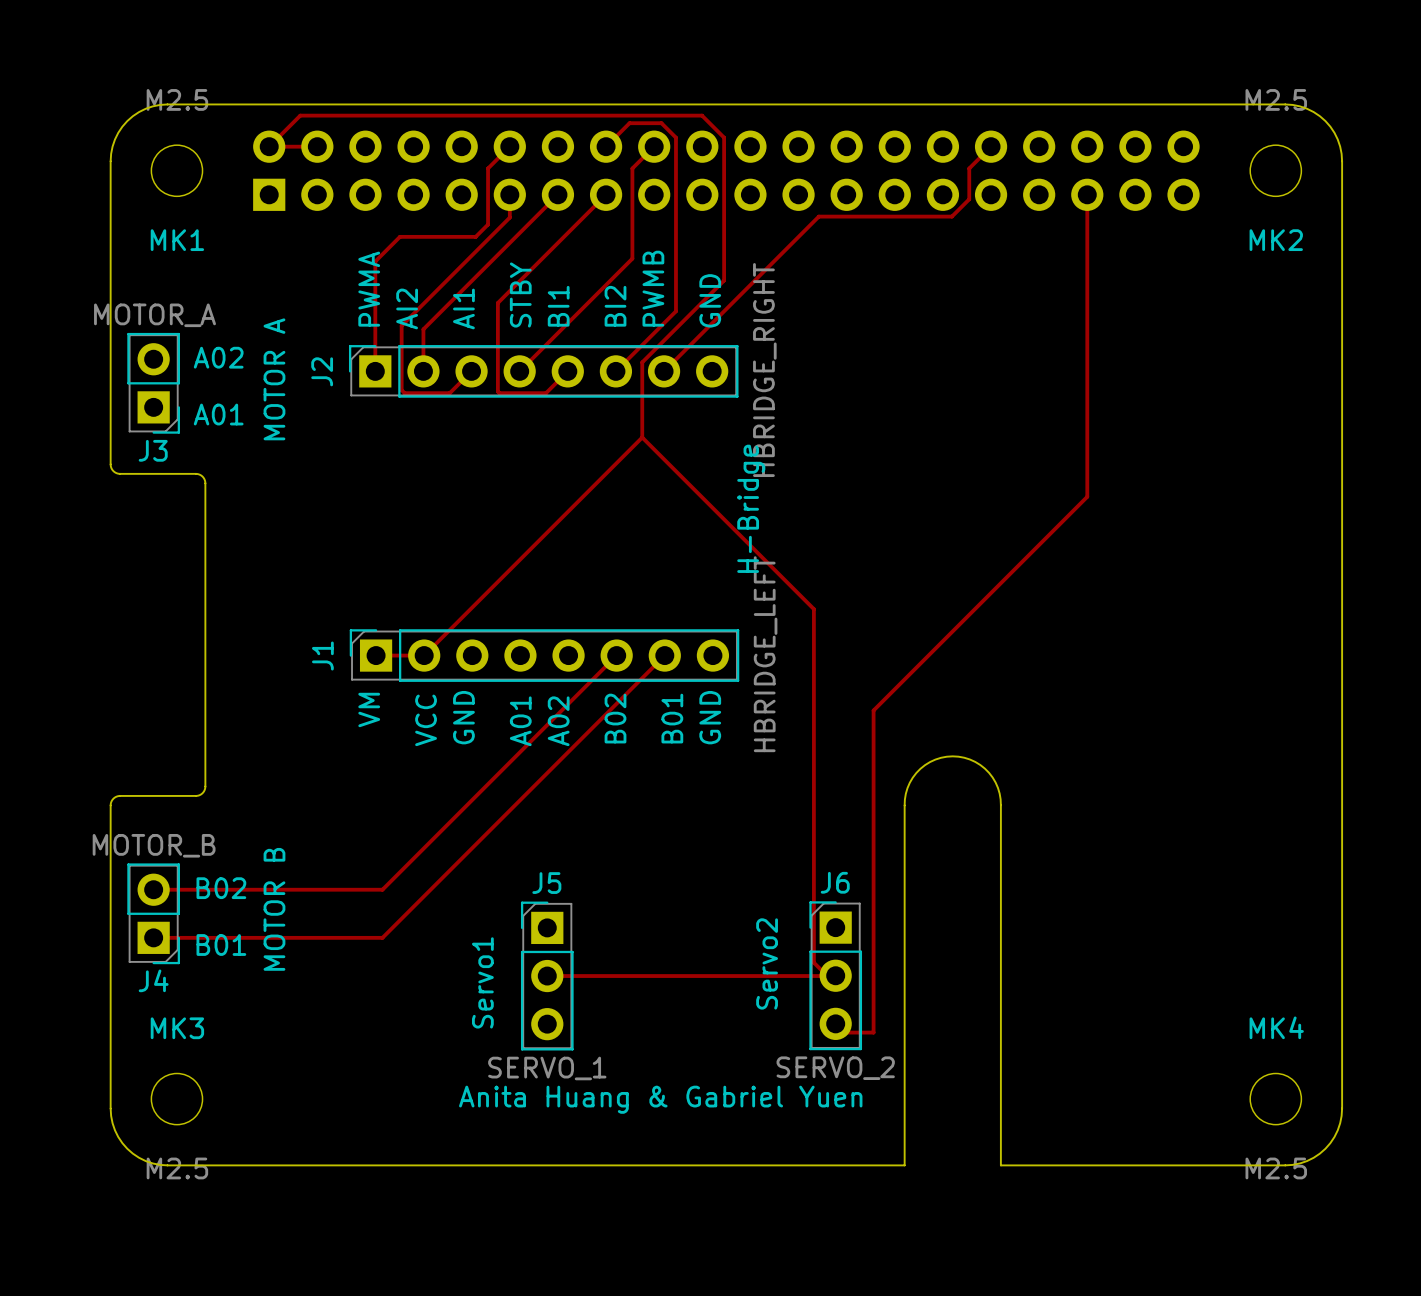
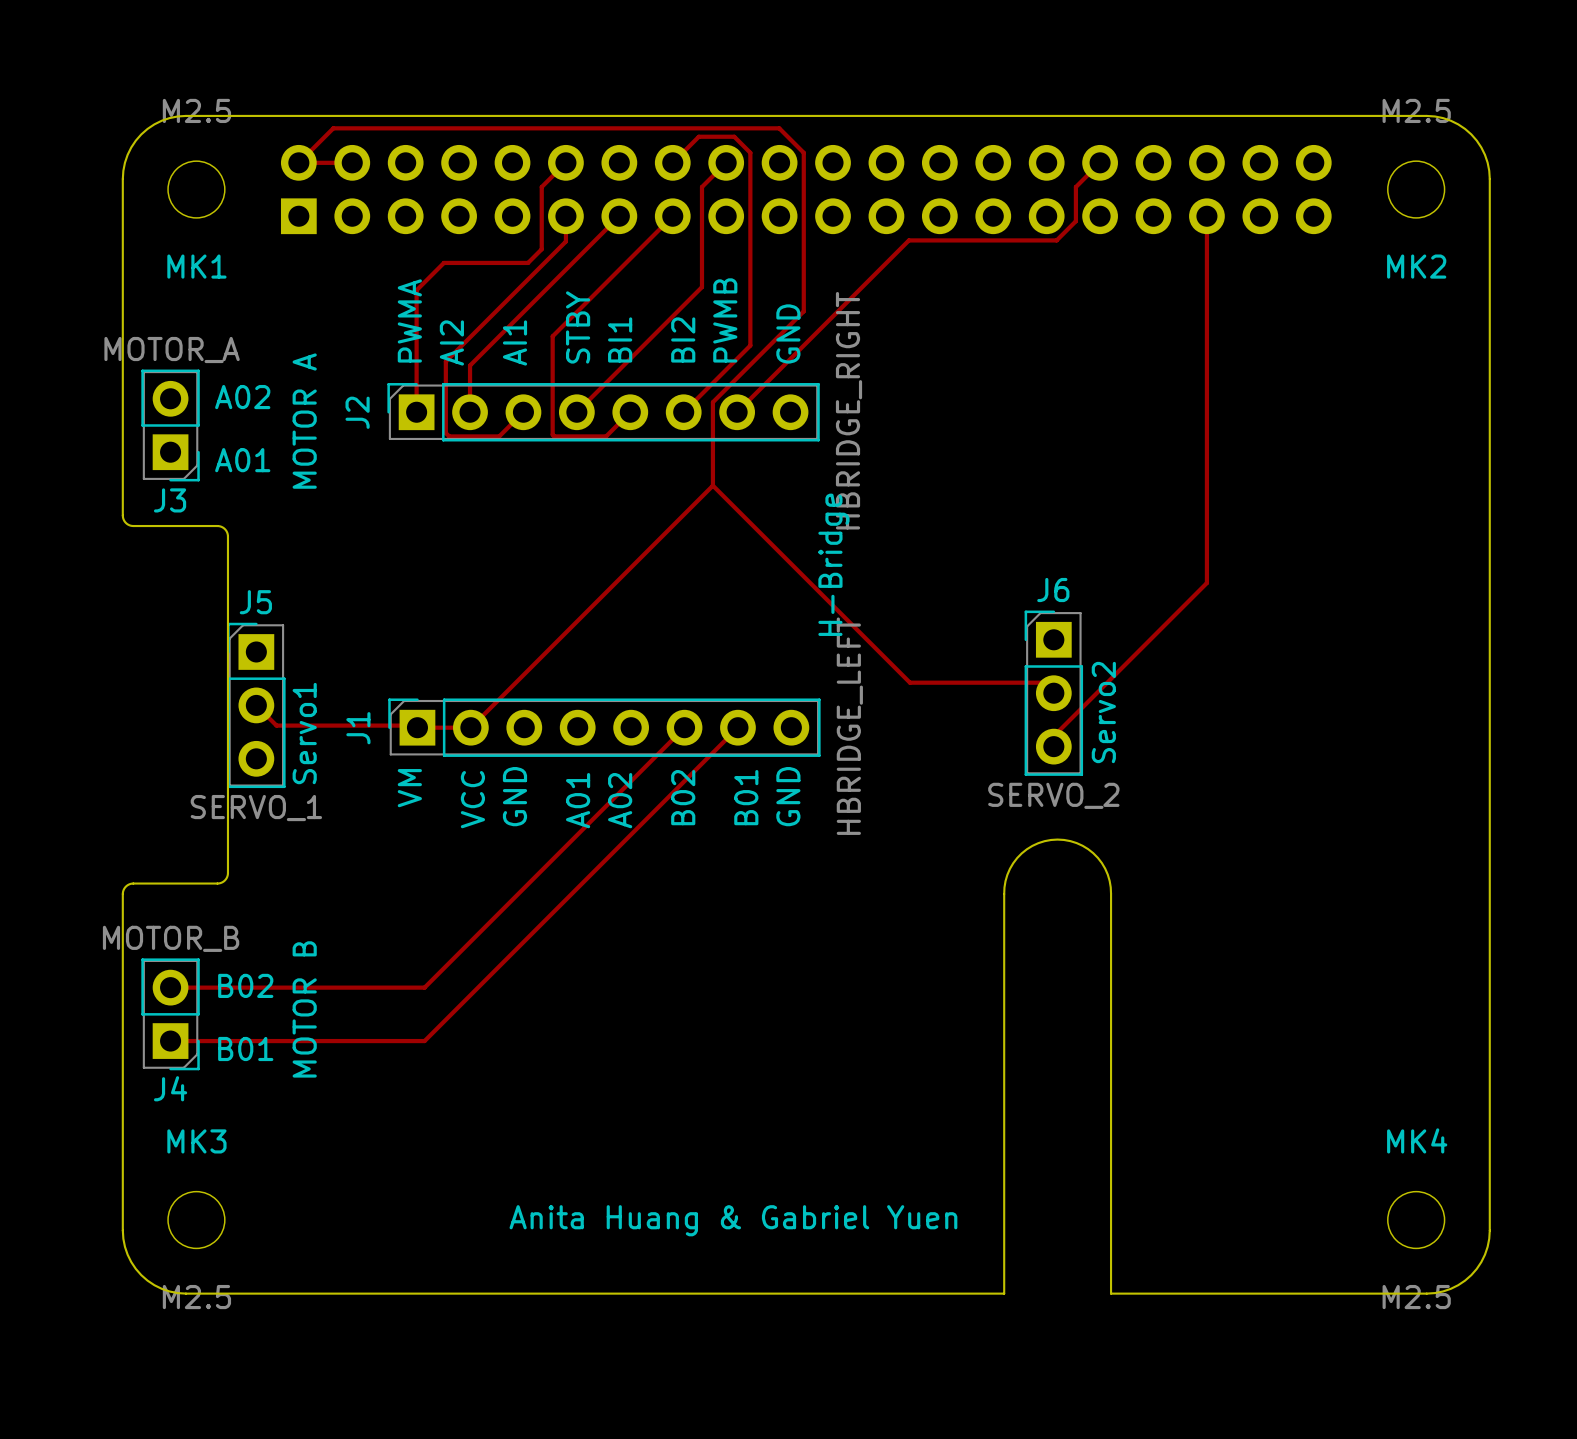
track: (1087, 496) (873, 710) (873, 1032) (835, 1032) -> (1206, 551) (1206, 583) (1053, 736)
track: (813, 609) (813, 962) (835, 984) -> (903, 676) (909, 682) (1053, 682)
track: none -> (256, 705) (276, 725) (422, 725)
text position: Servo2 (767, 963) -> Servo2 (1103, 712)
track: (835, 975) (547, 976) -> none
J6 position: (835, 975) -> (1053, 693)
J5 position: (547, 976) -> (256, 705)
text position: Servo1 (482, 982) -> Servo1 (304, 733)

